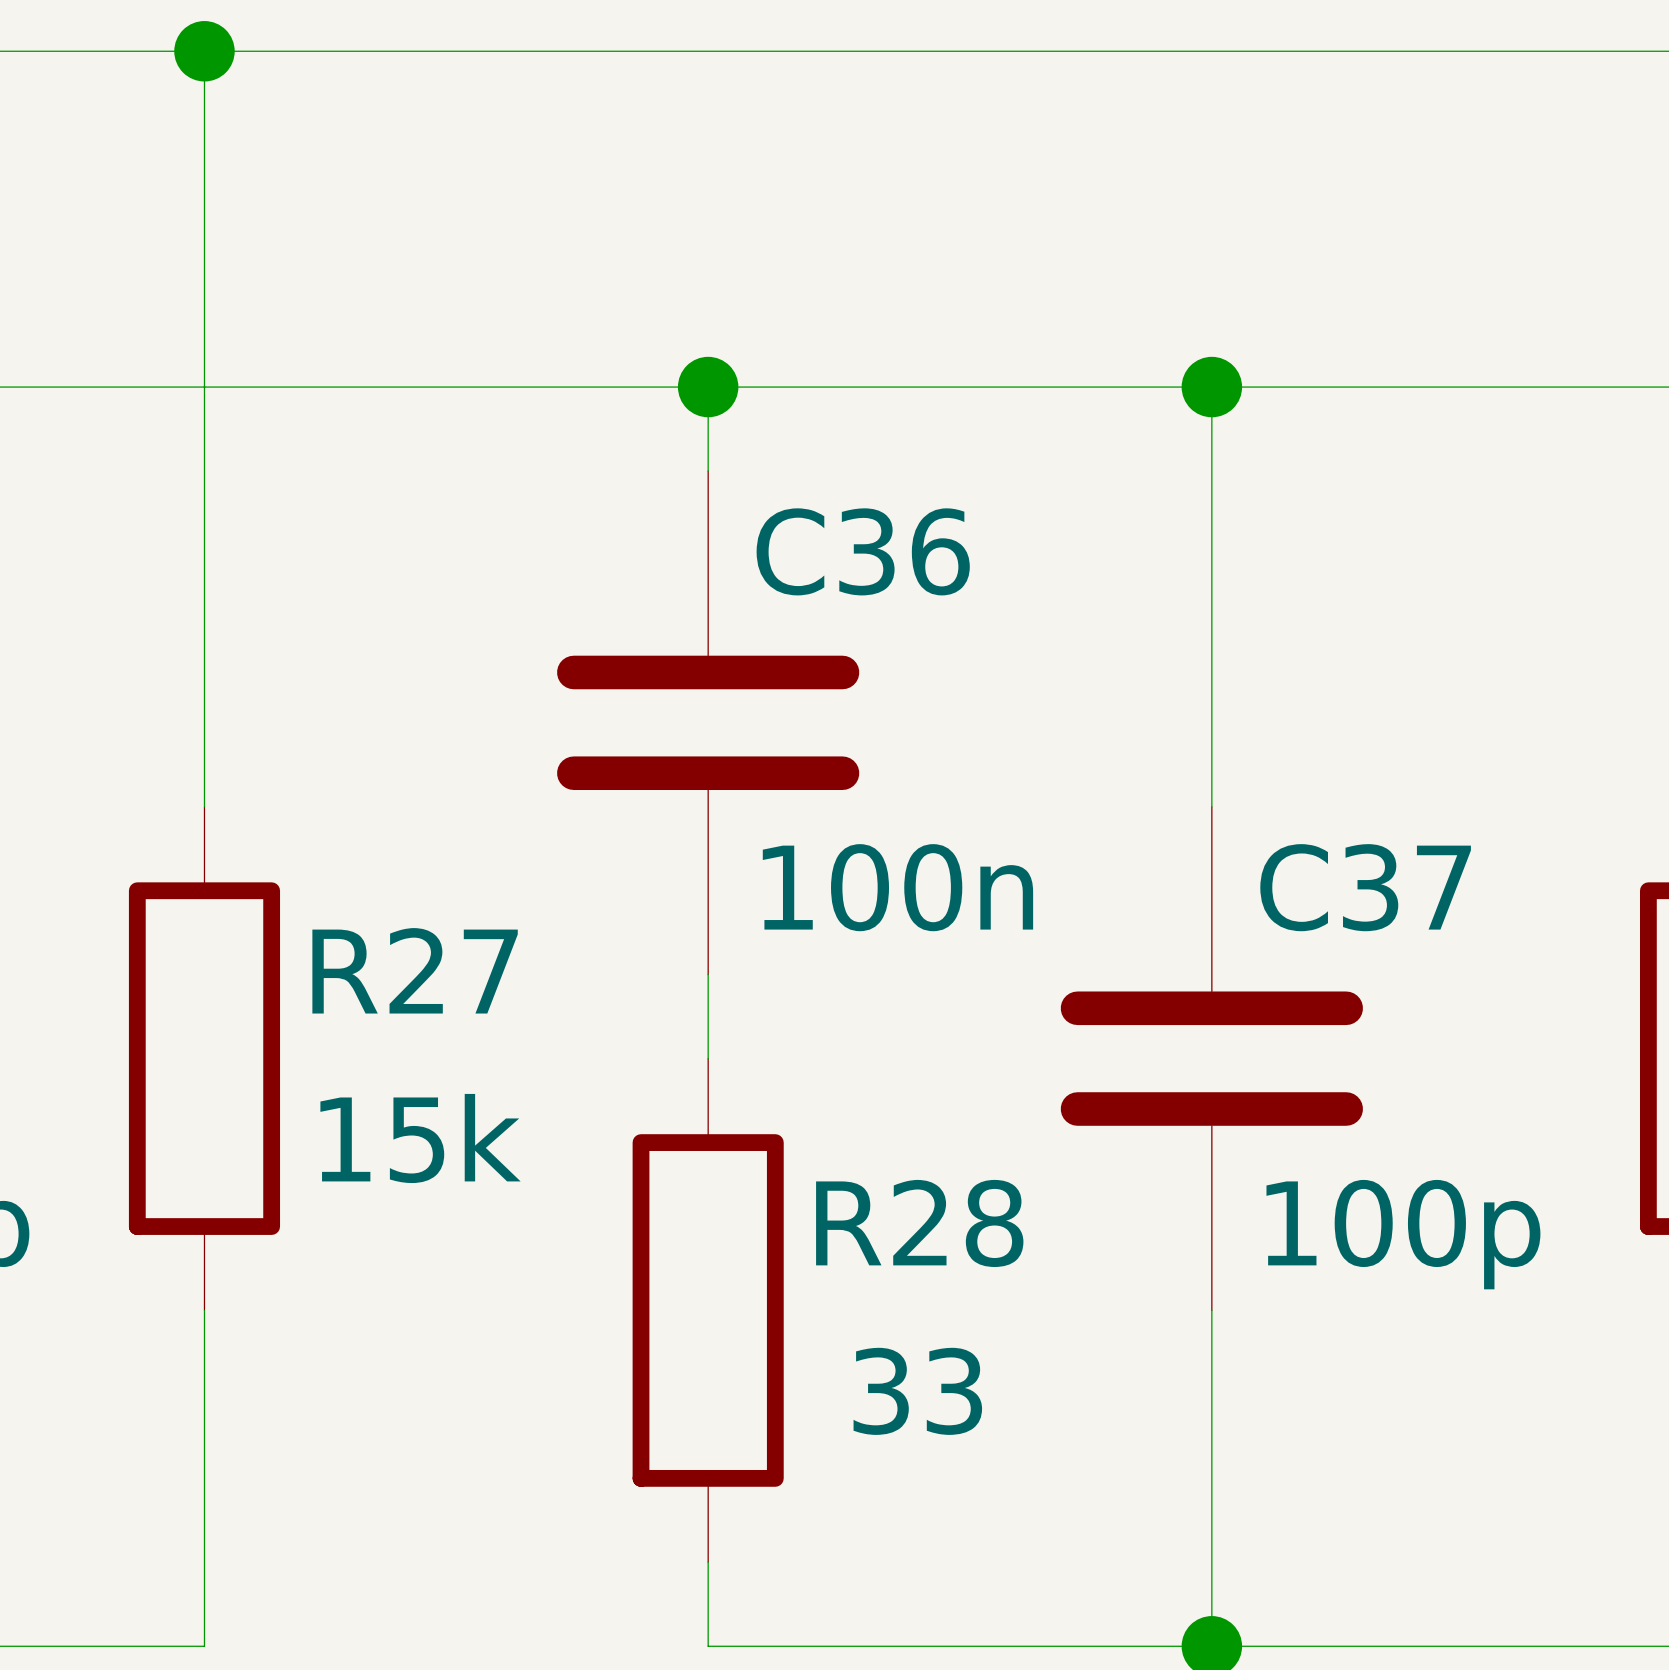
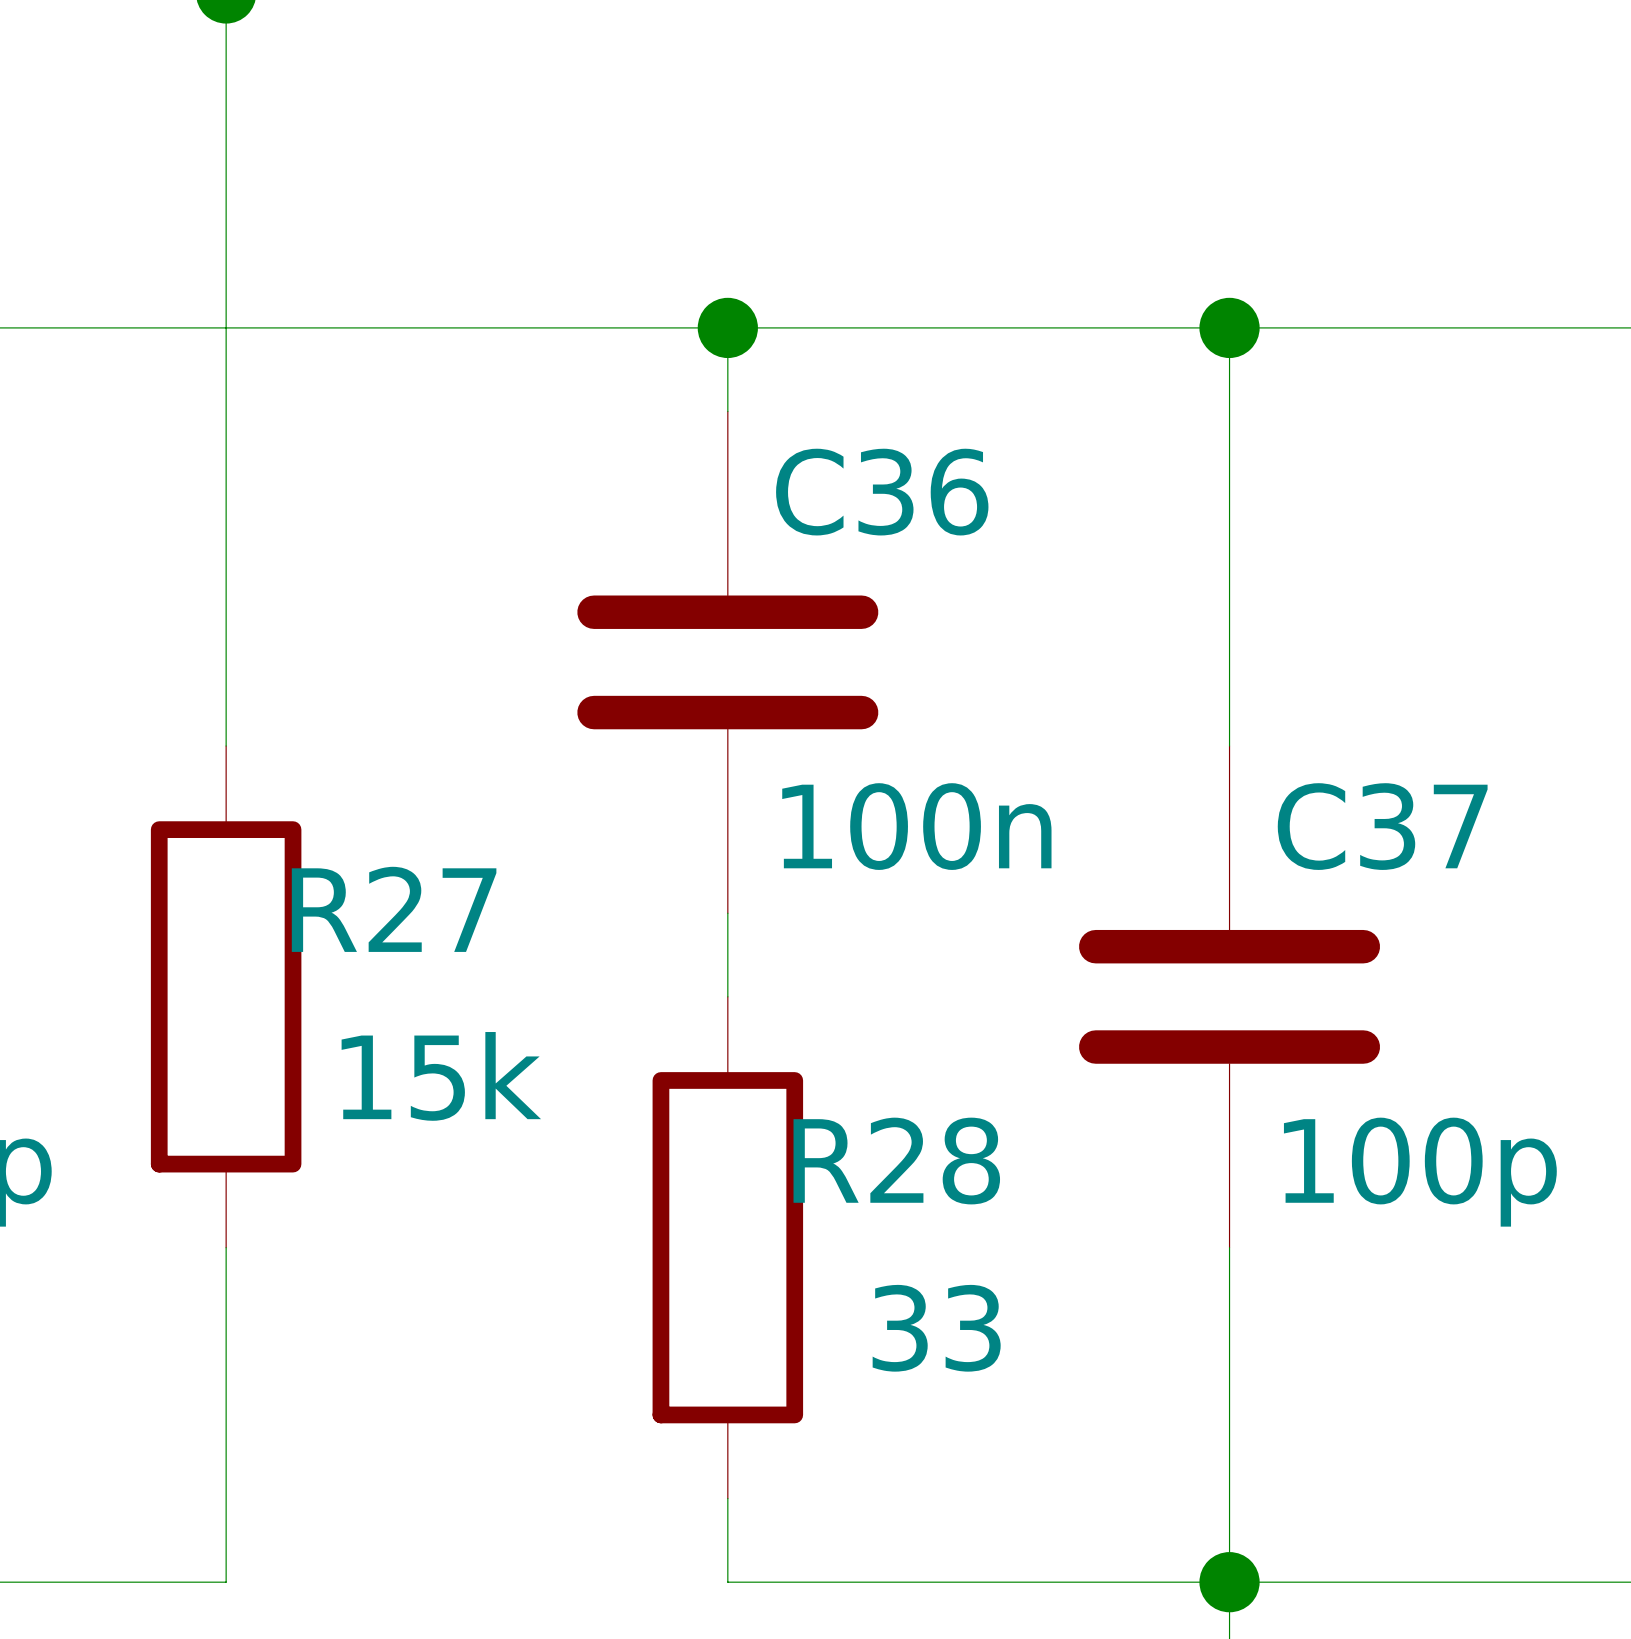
R27 name position: R27 (415, 970) -> R27 (394, 909)
R28 name position: R28 (919, 1223) -> R28 (896, 1161)

